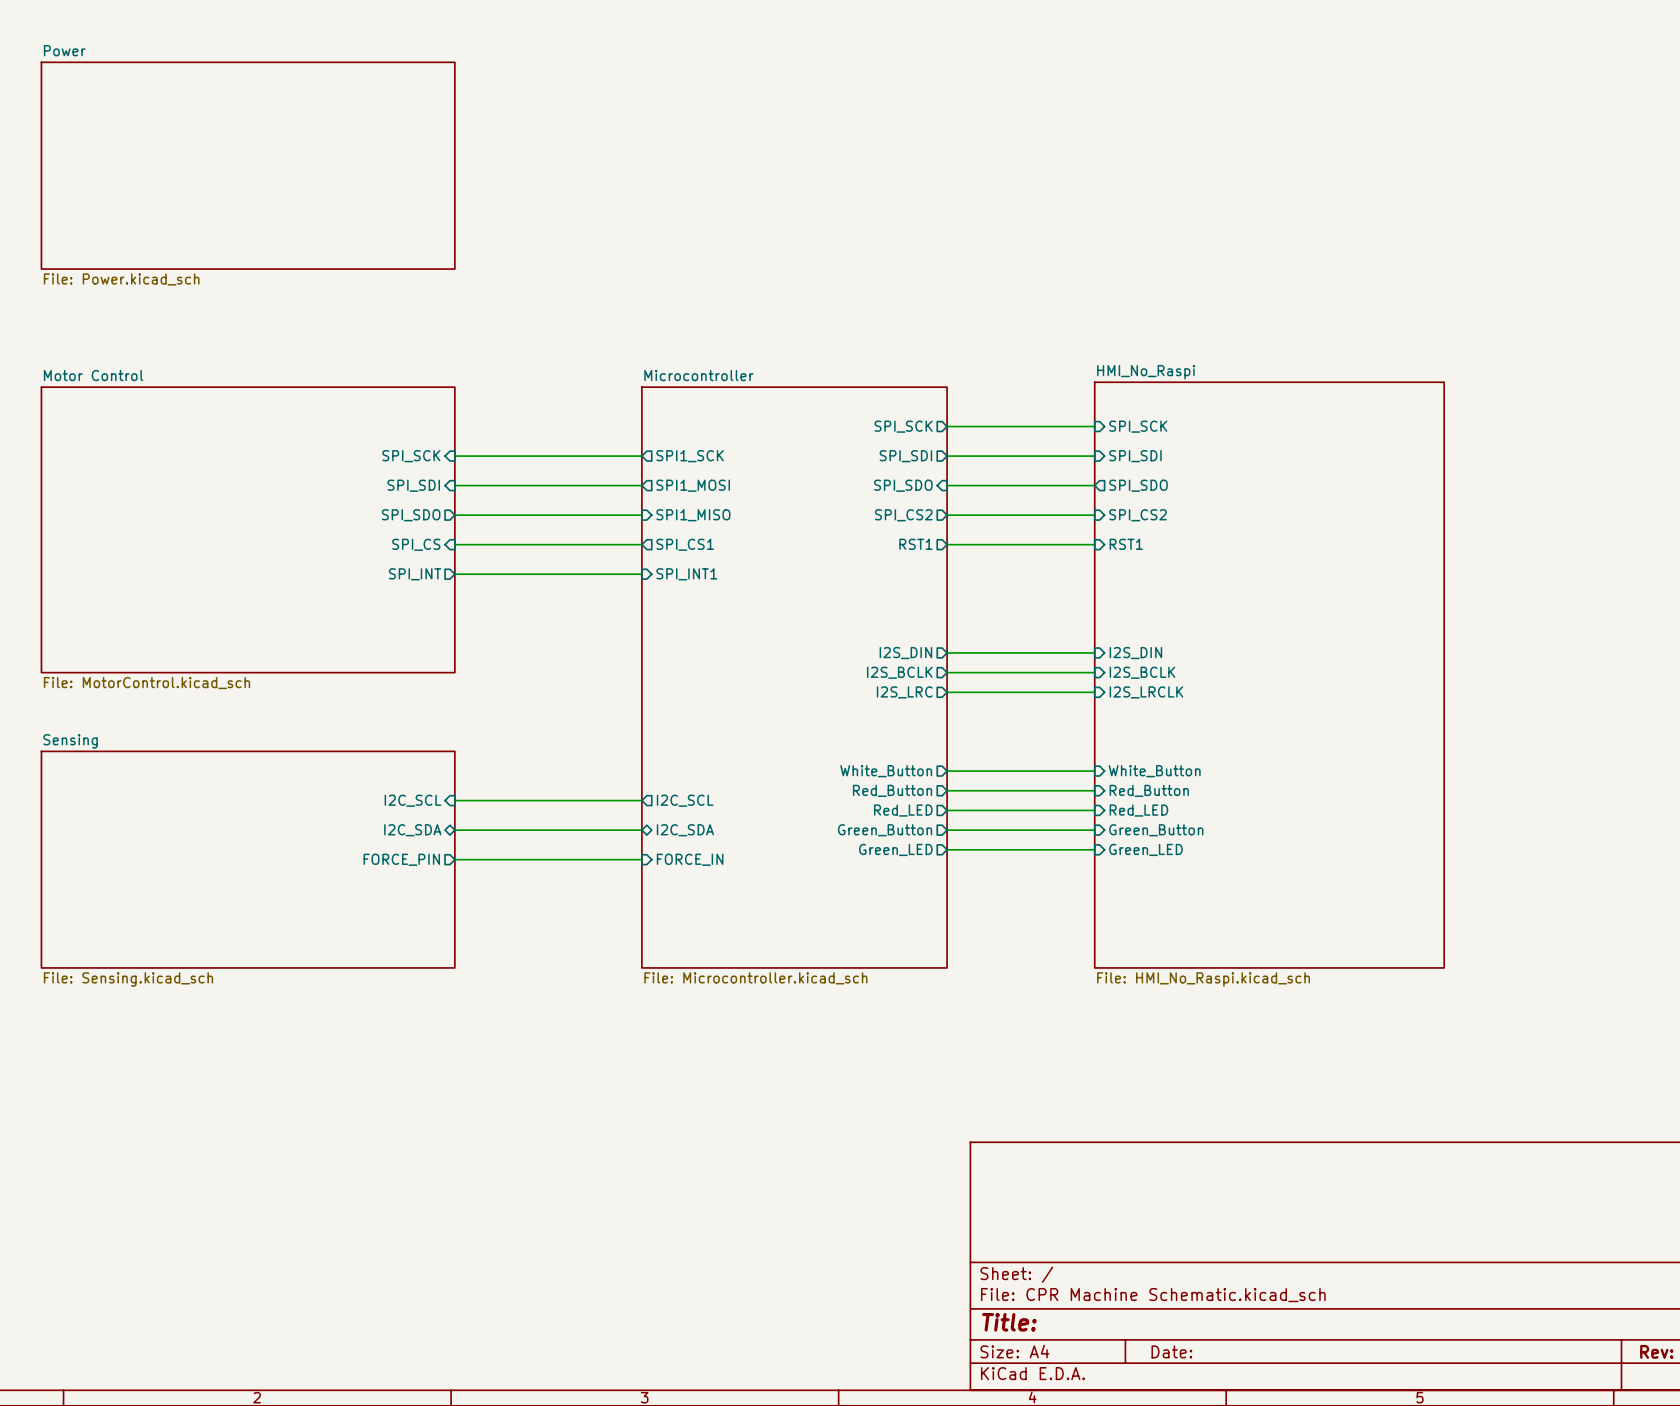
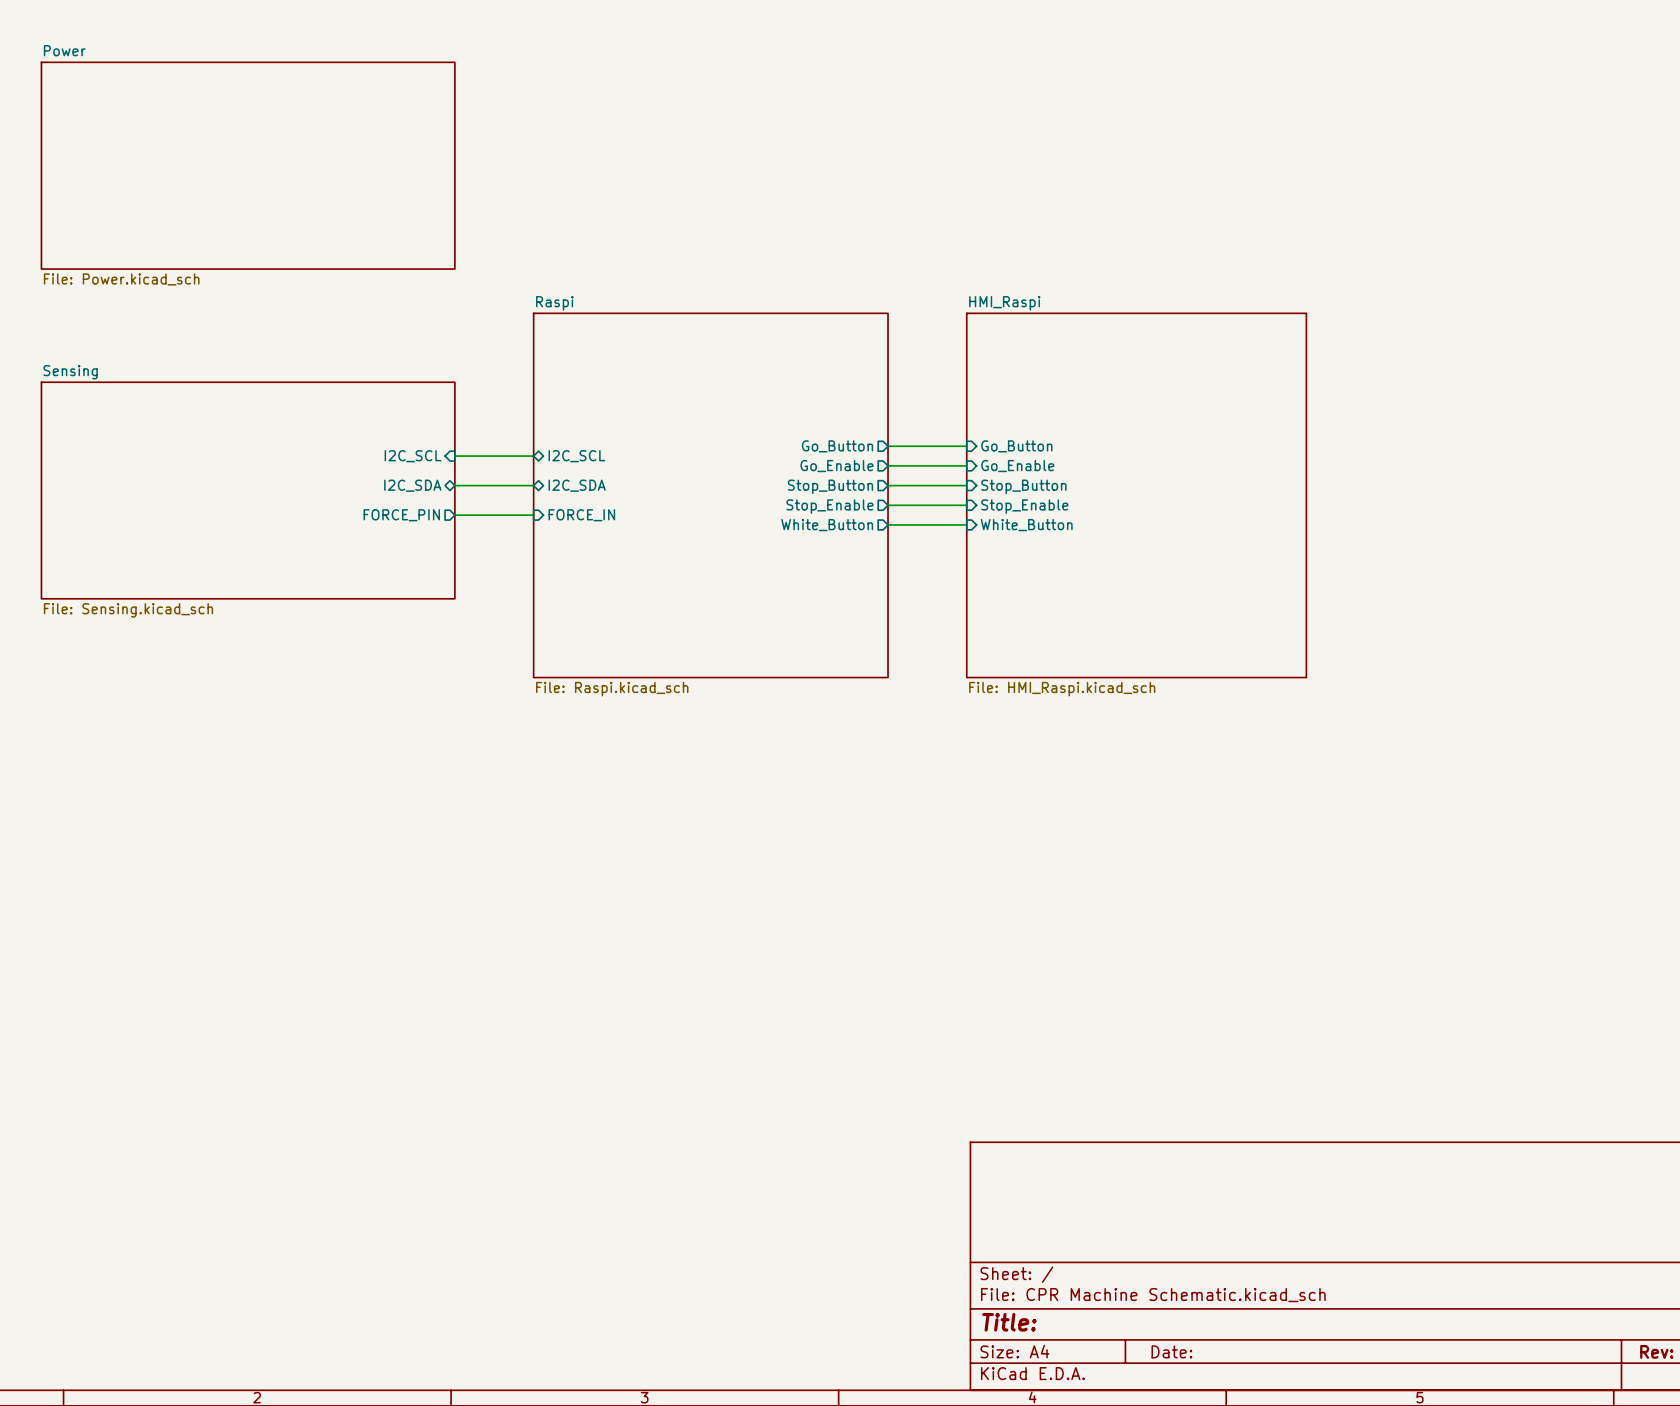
sheet pin: SPI_SCK (903, 426) -> none
wire: (947, 426) (1094, 426) -> none
sheet pin: SPI_SCK (1138, 426) -> none
sheet pin: none -> Go_Button (837, 446)
wire: none -> (888, 446) (966, 446)
sheet pin: none -> Go_Button (1016, 446)
sheet pin: SPI_SCK (411, 456) -> I2C_SCL (413, 456)
wire: (533, 456) (641, 456) -> none
sheet pin: none -> I2C_SCL (576, 456)
sheet pin: SPI1_SCK (690, 456) -> none
sheet pin: SPI_SDI (905, 456) -> none
wire: (947, 456) (1094, 456) -> none
sheet pin: SPI_SDI (1135, 456) -> none
wire: none -> (888, 465) (966, 465)
sheet pin: none -> Go_Enable (837, 466)
sheet pin: none -> Go_Enable (1017, 466)
sheet pin shape: input (413, 485) -> bidirectional (412, 485)
sheet pin: SPI_SDI (413, 485) -> I2C_SDA (412, 485)
wire: (533, 485) (641, 485) -> none
sheet pin: none -> I2C_SDA (577, 485)
sheet pin: SPI1_MOSI (693, 485) -> none
wire: none -> (888, 485) (947, 485)
sheet pin: SPI_SDO (903, 485) -> none
wire: (966, 485) (1094, 485) -> none
sheet pin: SPI_SDO (1138, 485) -> none
sheet pin: none -> Stop_Button (830, 486)
sheet pin: none -> Stop_Button (1023, 486)
sheet Sensing: none -> File: Sensing.kicad_sch (248, 490)
sheet Raspi: none -> File: Raspi.kicad_sch (710, 495)
sheet HMI_Raspi: none -> File: HMI_Raspi.kicad_sch (1136, 495)
wire: none -> (888, 505) (966, 505)
sheet pin: none -> Stop_Enable (829, 506)
sheet pin: none -> Stop_Enable (1024, 506)
sheet pin: SPI_SDO (411, 515) -> FORCE_PIN (401, 515)
wire: (533, 515) (641, 515) -> none
sheet pin: none -> FORCE_IN (581, 515)
sheet pin: SPI1_MISO (693, 515) -> none
sheet pin: SPI_CS2 (903, 515) -> none
wire: (947, 515) (1094, 515) -> none
sheet pin: SPI_CS2 (1138, 515) -> none
wire: none -> (888, 524) (966, 524)
sheet pin: none -> White_Button (827, 525)
sheet pin: none -> White_Button (1026, 525)
sheet Motor Control: File: MotorControl.kicad_sch (248, 529) -> none
sheet pin: SPI_CS (416, 544) -> none
wire: (454, 544) (641, 544) -> none
sheet pin: SPI_CS1 (685, 544) -> none
sheet pin: RST1 (915, 544) -> none
wire: (947, 544) (1094, 544) -> none
sheet pin: RST1 (1126, 544) -> none
sheet pin: SPI_INT (415, 574) -> none
wire: (454, 574) (641, 574) -> none
sheet pin: SPI_INT1 (686, 574) -> none
wire: (947, 652) (1094, 652) -> none
sheet pin: I2S_DIN (905, 653) -> none
sheet pin: I2S_DIN (1135, 653) -> none
sheet pin: I2S_BCLK (899, 672) -> none
wire: (947, 672) (1094, 672) -> none
sheet pin: I2S_BCLK (1142, 672) -> none
sheet HMI_No_Raspi: File: HMI_No_Raspi.kicad_sch (1269, 675) -> none
sheet Microcontroller: File: Microcontroller.kicad_sch (794, 677) -> none
sheet pin: I2S_LRC (904, 692) -> none
wire: (947, 692) (1094, 692) -> none
sheet pin: I2S_LRCLK (1146, 692) -> none
sheet pin: White_Button (886, 771) -> none
wire: (947, 771) (1094, 771) -> none
sheet pin: White_Button (1154, 771) -> none
sheet pin: Red_Button (892, 790) -> none
wire: (947, 790) (1094, 790) -> none
sheet pin: Red_Button (1149, 790) -> none
sheet pin: I2C_SCL (413, 800) -> none
wire: (454, 800) (641, 800) -> none
sheet pin: I2C_SCL (685, 800) -> none
sheet pin: Red_LED (903, 810) -> none
wire: (947, 810) (1094, 810) -> none
sheet pin: Red_LED (1138, 810) -> none
sheet pin: I2C_SDA (412, 830) -> none
wire: (454, 830) (641, 830) -> none
sheet pin: I2C_SDA (685, 830) -> none
sheet pin: Green_Button (885, 830) -> none
wire: (947, 830) (1094, 830) -> none
sheet pin: Green_Button (1156, 830) -> none
sheet pin: Green_LED (895, 849) -> none
wire: (947, 849) (1094, 849) -> none
sheet pin: Green_LED (1145, 849) -> none
sheet Sensing: File: Sensing.kicad_sch (248, 859) -> none
sheet pin: FORCE_PIN (401, 859) -> none
wire: (454, 859) (641, 859) -> none
sheet pin: FORCE_IN (690, 859) -> none

